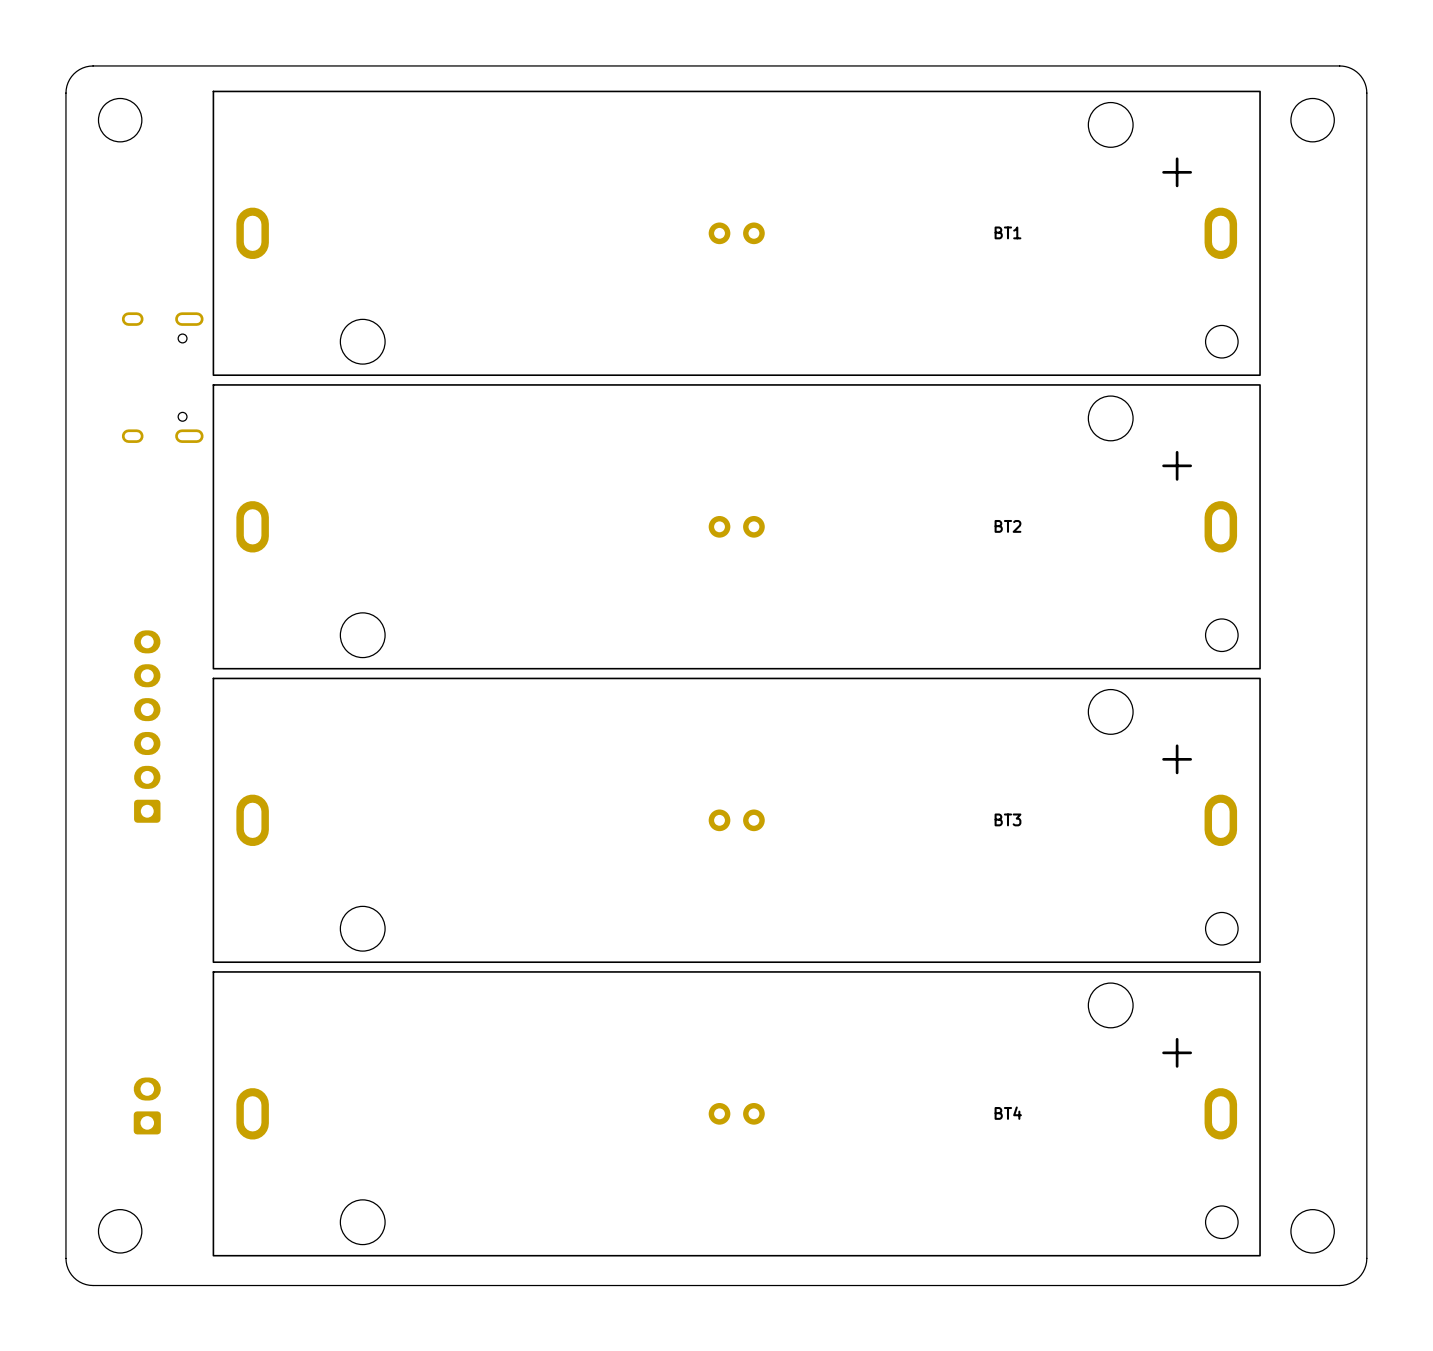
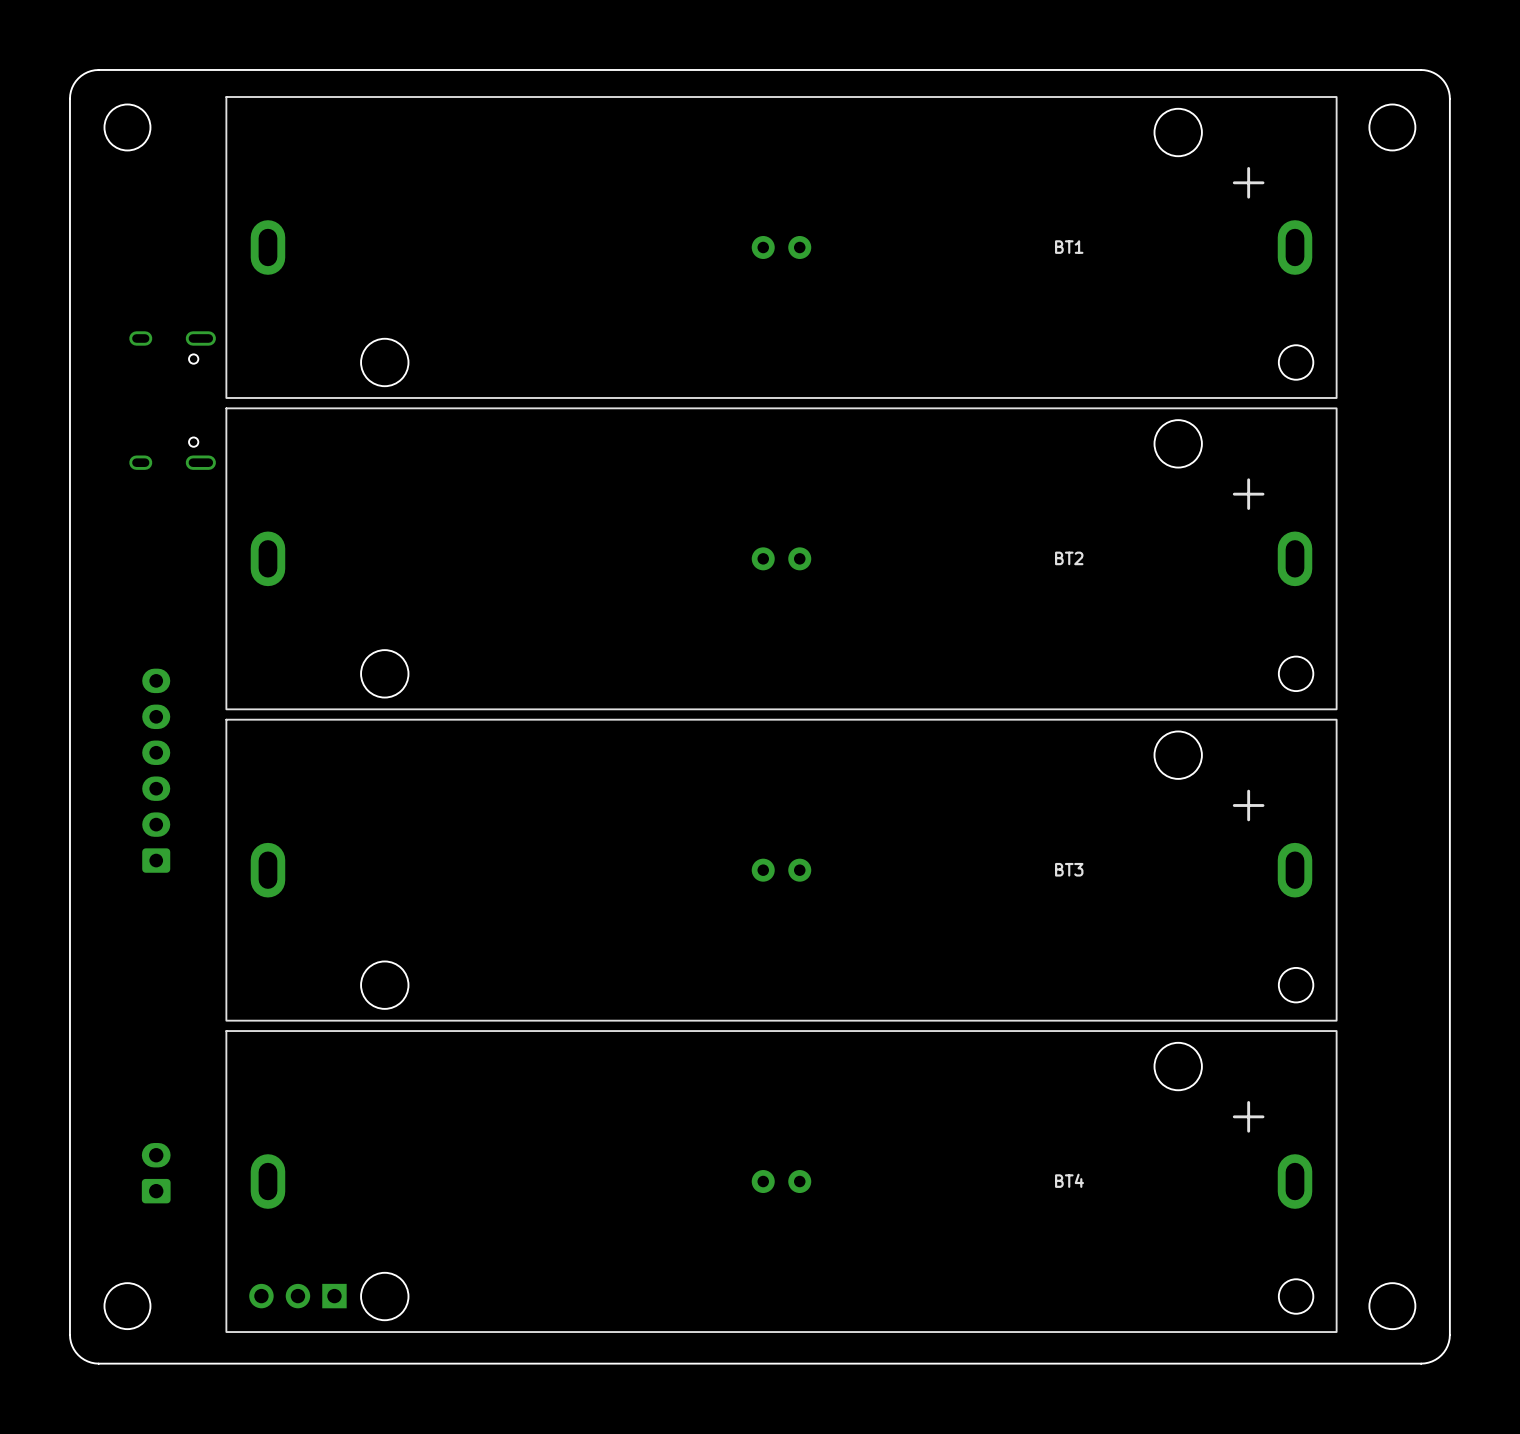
part: none -> (297, 1296)

